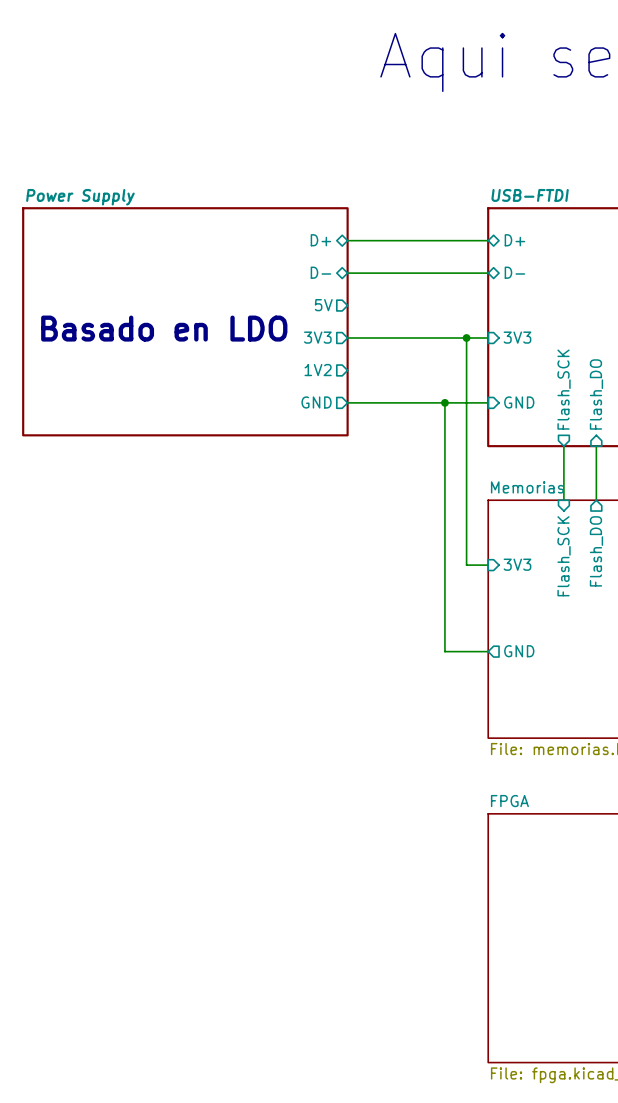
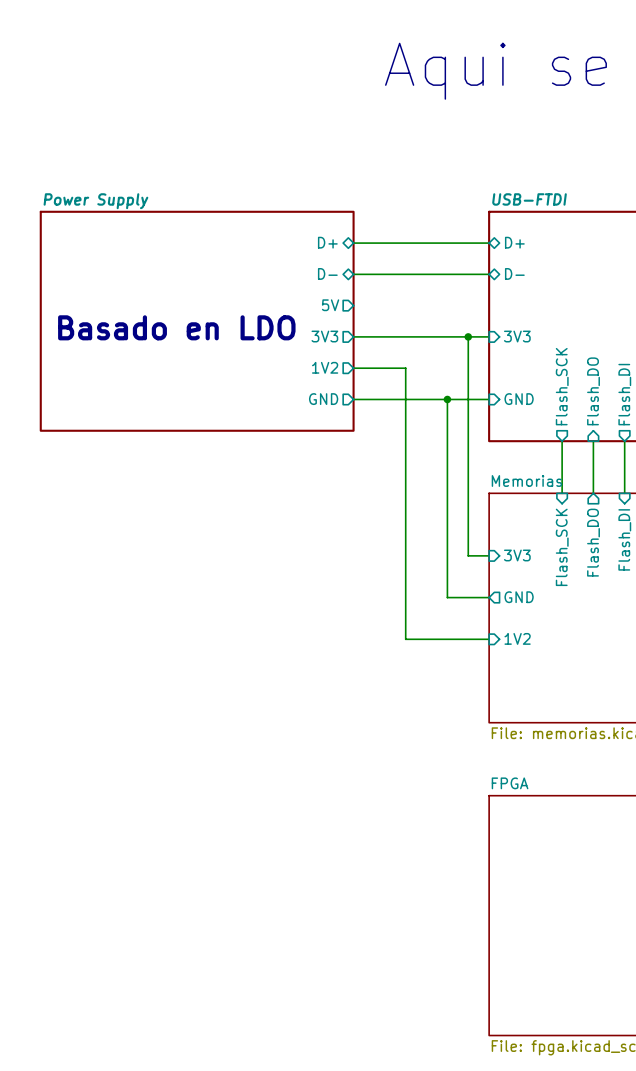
wire: none -> (353, 368) (405, 368) (405, 639) (447, 639)
sheet pin: none -> GND (519, 597)
wire: (444, 608) (444, 651) -> (447, 597) (489, 597)
sheet pin shape: output (519, 651) -> input (517, 638)
sheet pin: GND (519, 651) -> 1V2 (517, 638)

